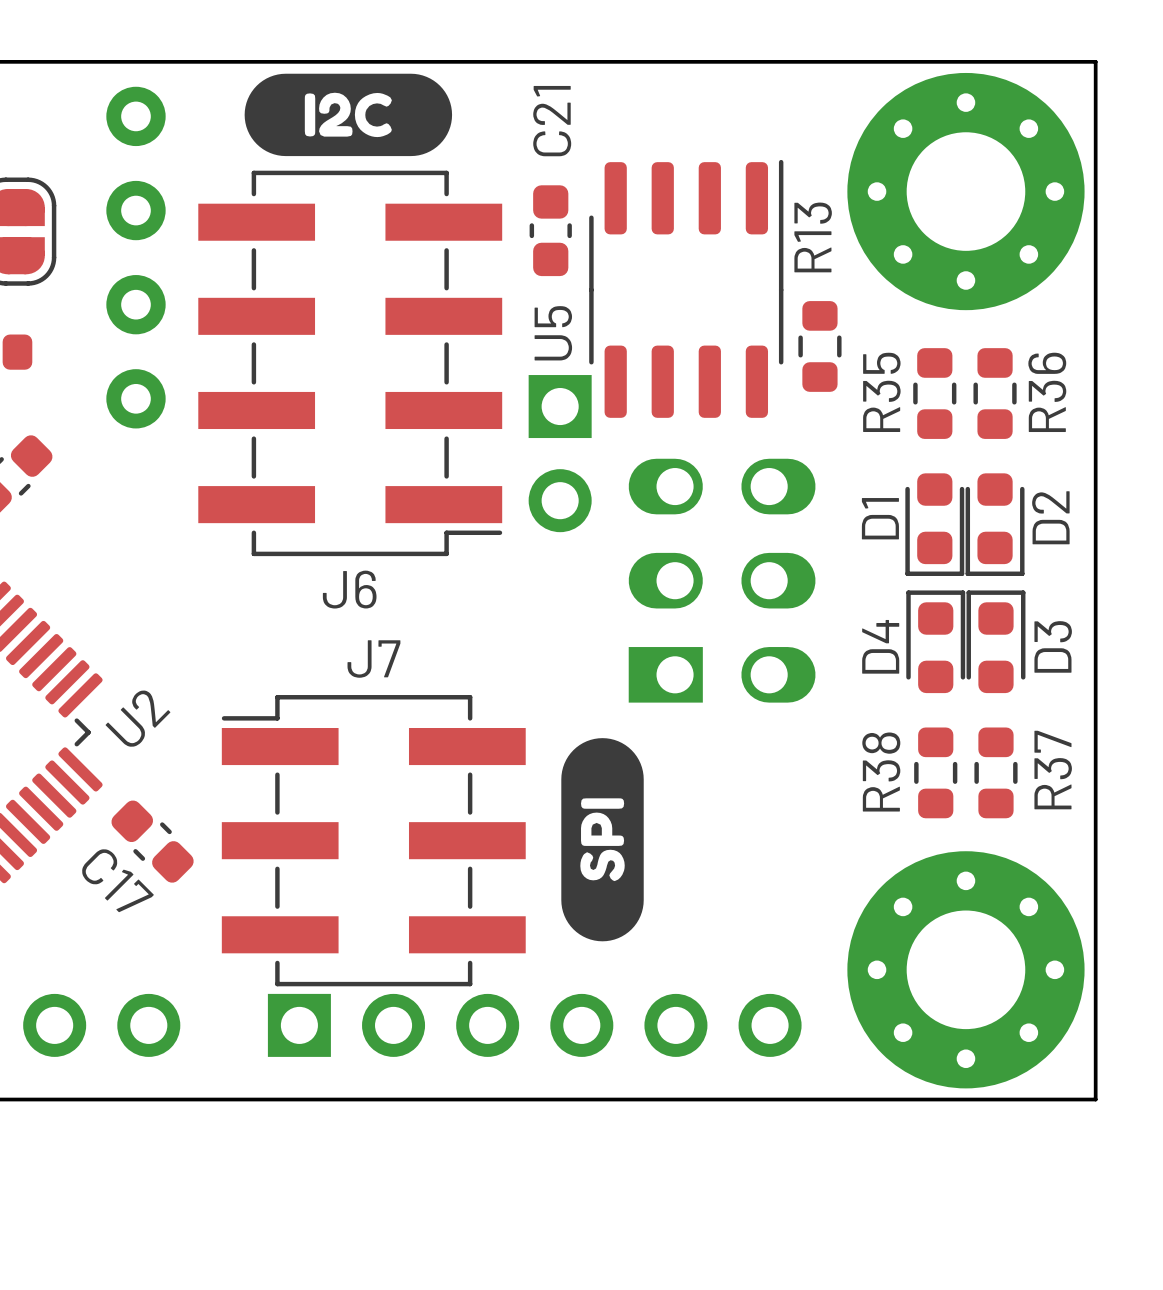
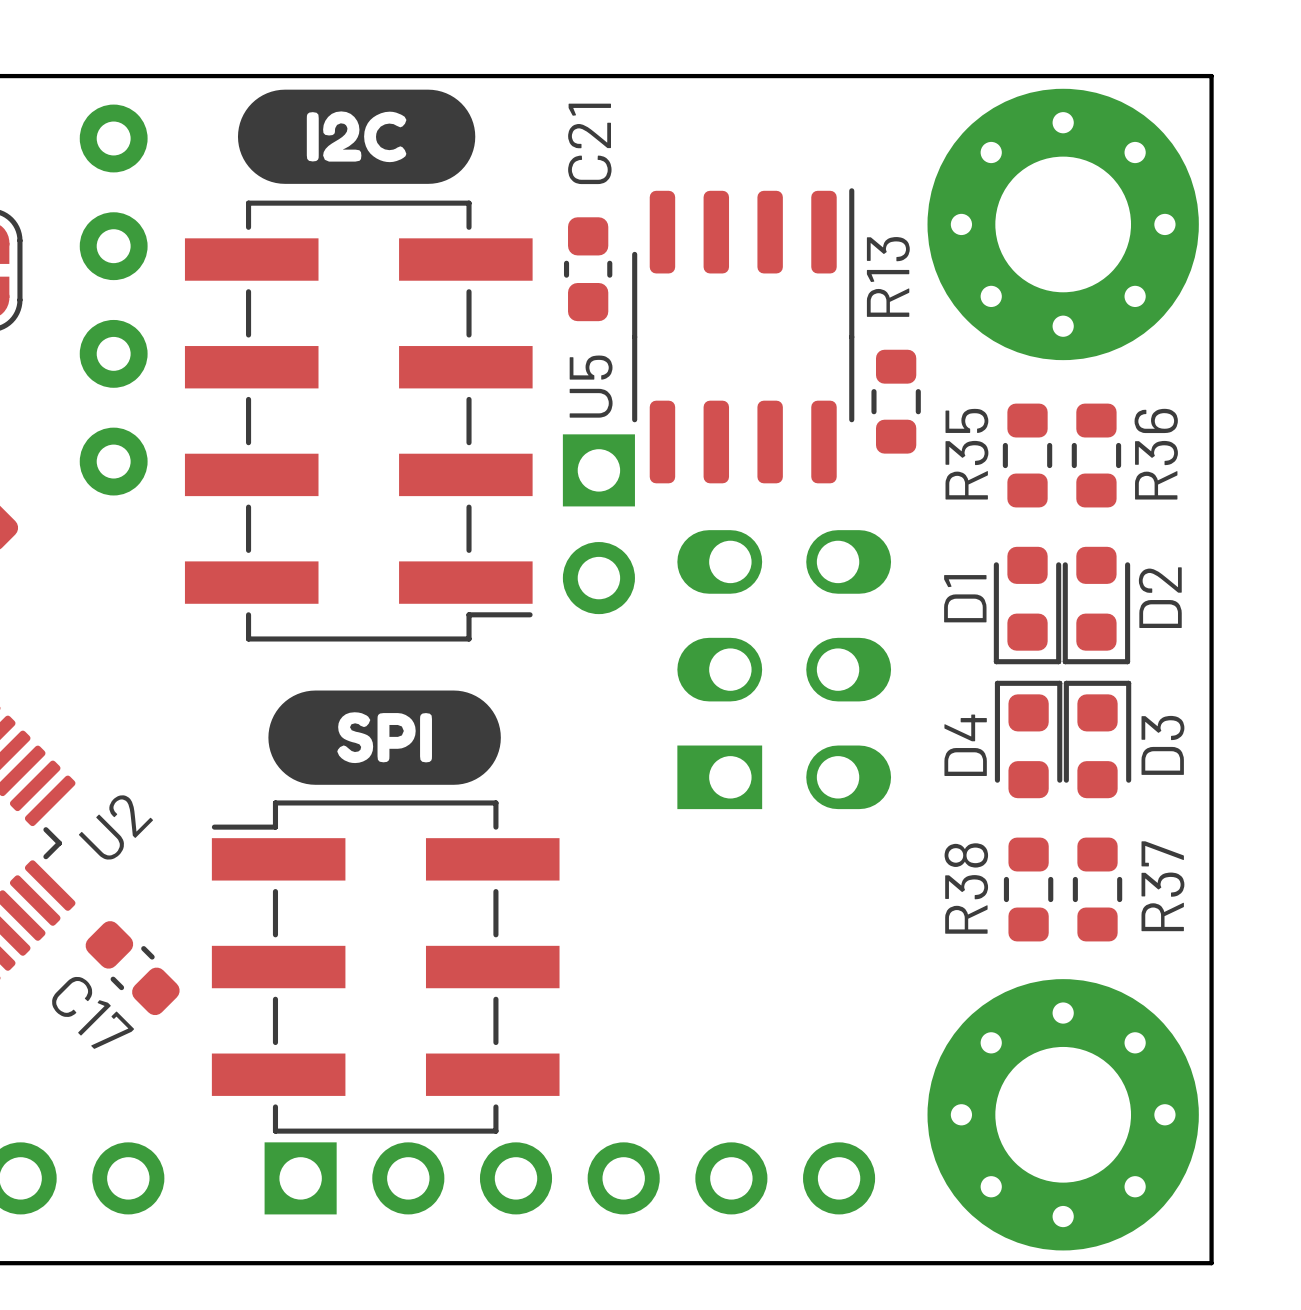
J6 name: J6 (349, 589) -> none
drawing: none -> [268, 690, 501, 785]
J7 name: J7 (373, 659) -> none
drawing: [561, 738, 644, 942] -> none

